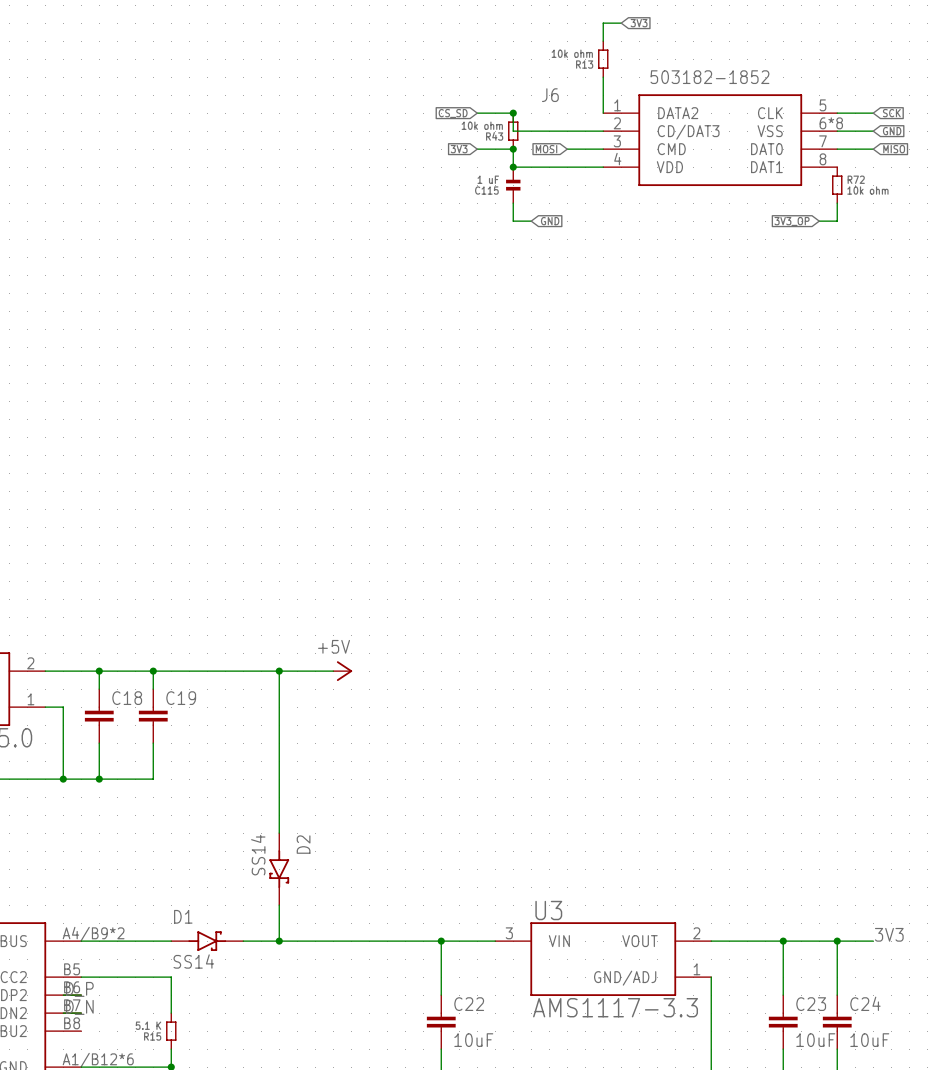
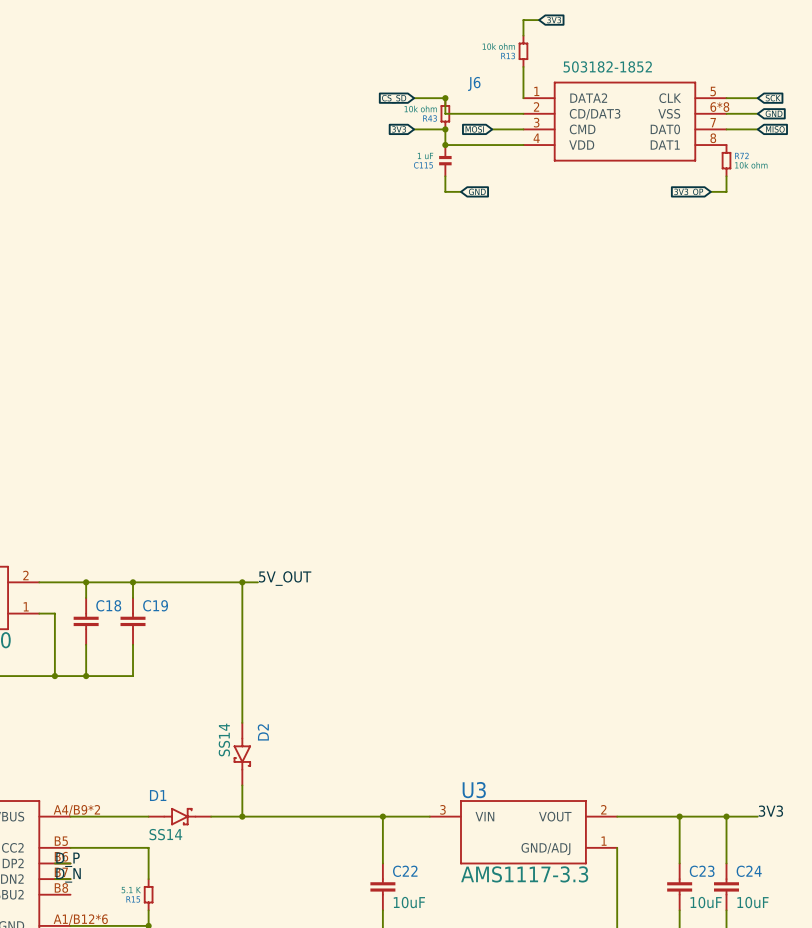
label: none -> 5V_OUT (285, 578)
wire: (297, 671) (333, 671) -> none
power symbol: +5V (342, 671) -> none

